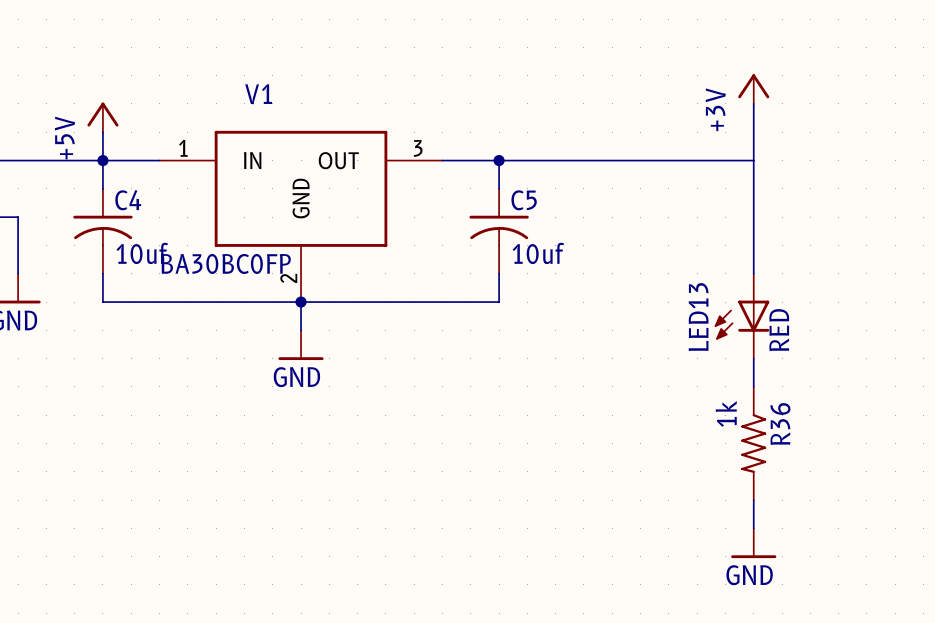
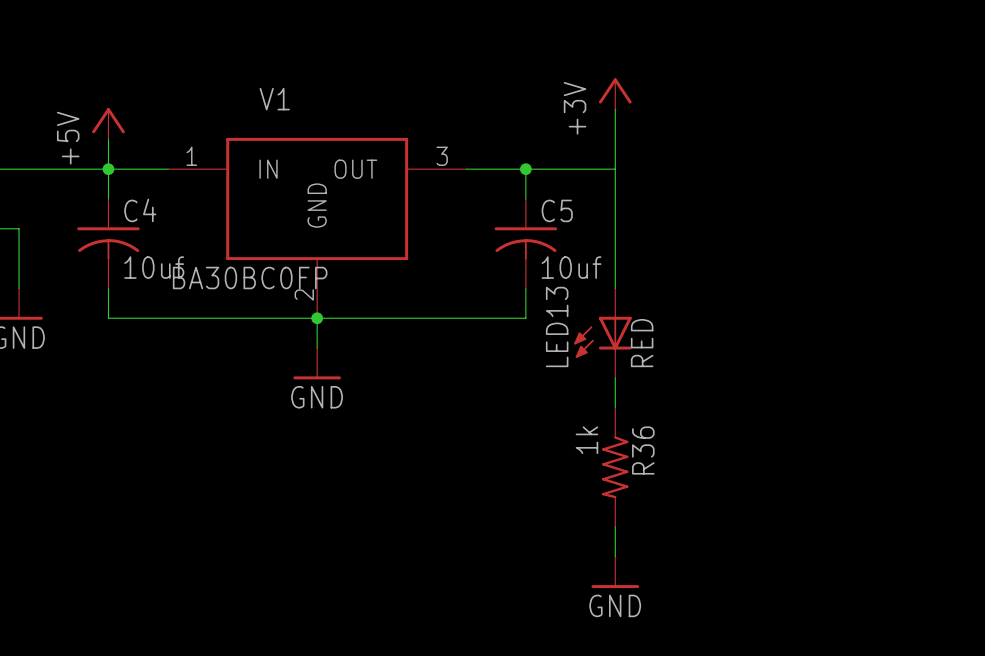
power symbol position: +3V (753, 89) -> +3V (615, 93)
wire: (753, 103) (753, 273) -> (615, 109) (615, 288)
wire: (583, 160) (753, 160) -> none
LED13 position: (741, 316) -> (602, 333)
wire: (753, 358) (753, 386) -> (615, 377) (615, 407)
R36 position: (753, 443) -> (615, 467)
wire: (753, 500) (753, 528) -> (615, 526) (615, 556)
power symbol position: GND (753, 543) -> GND (615, 572)

